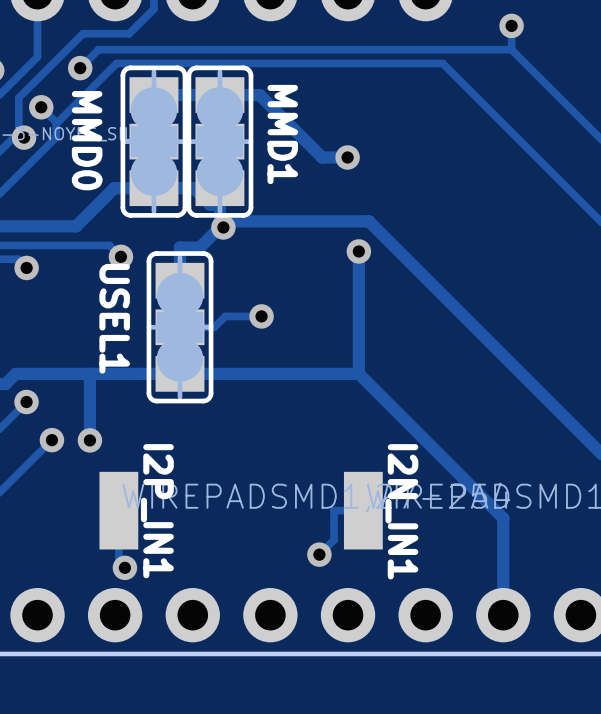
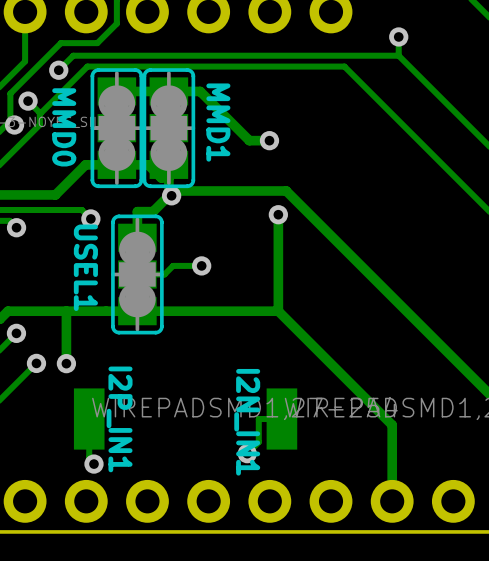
I2N_IN1 name position: I2N_IN1 (401, 511) -> I2N_IN1 (247, 422)

